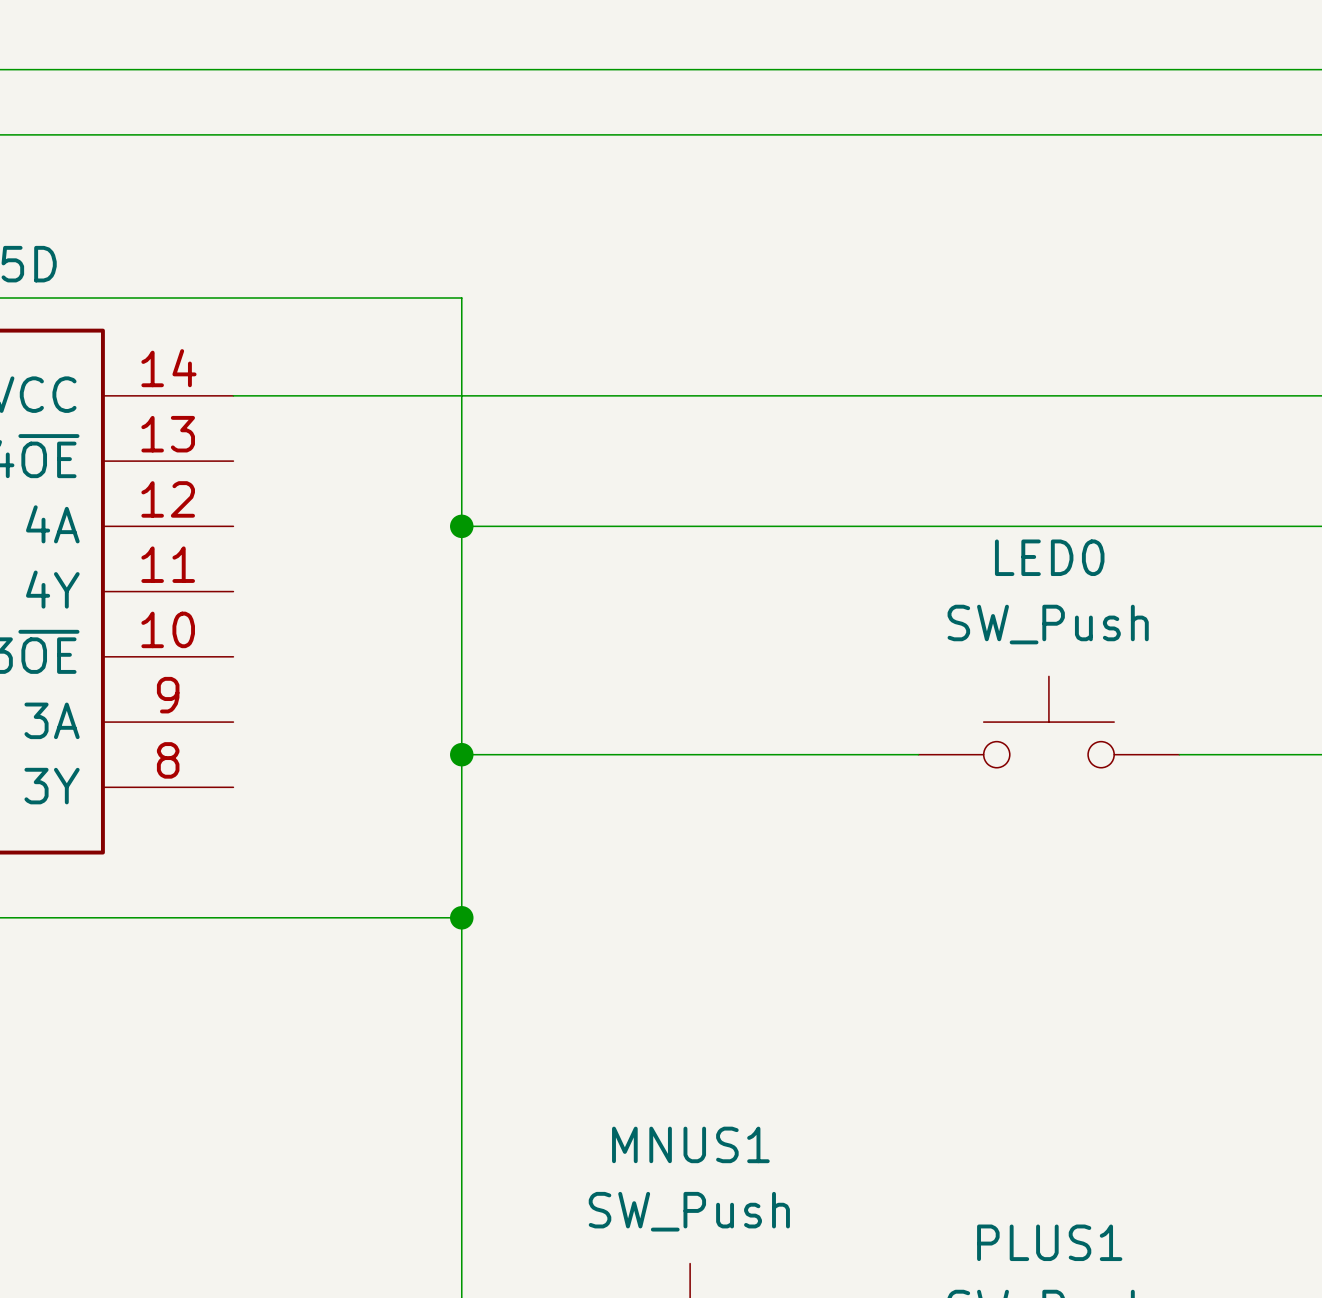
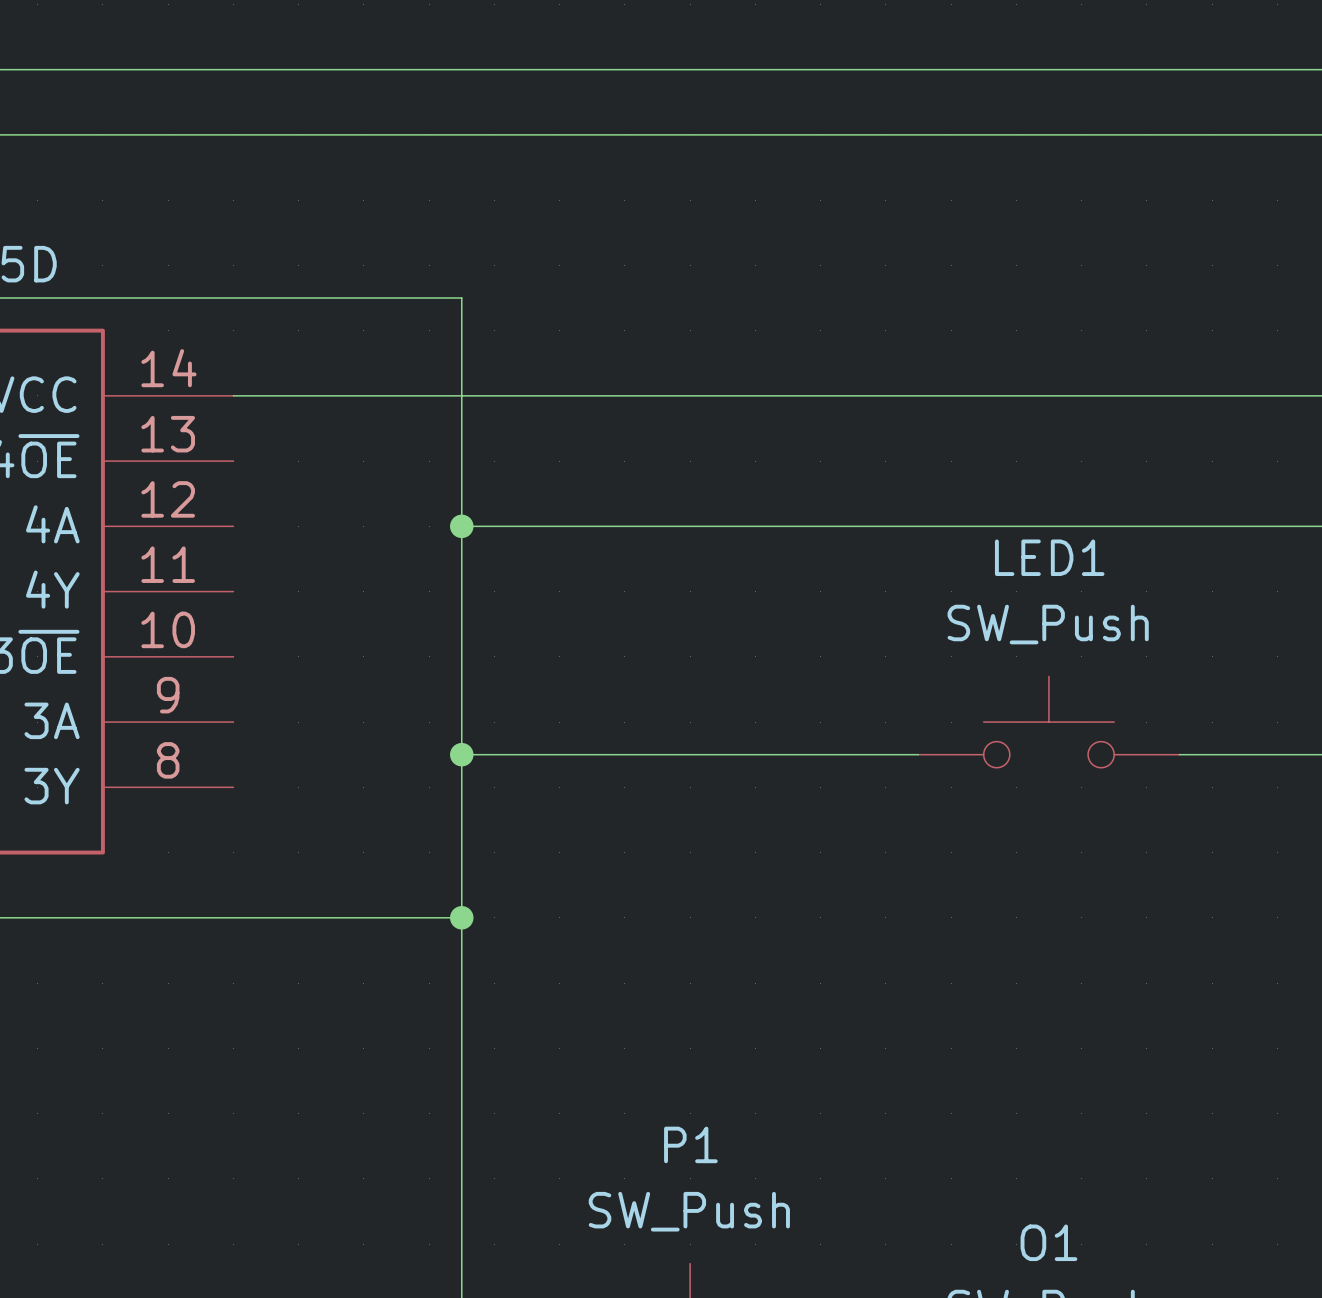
LED0 name: LED0 (1049, 557) -> LED1 (1049, 557)
MNUS1 name: MNUS1 (690, 1144) -> P1 (690, 1144)
PLUS1 name: PLUS1 (1049, 1242) -> O1 (1048, 1242)

